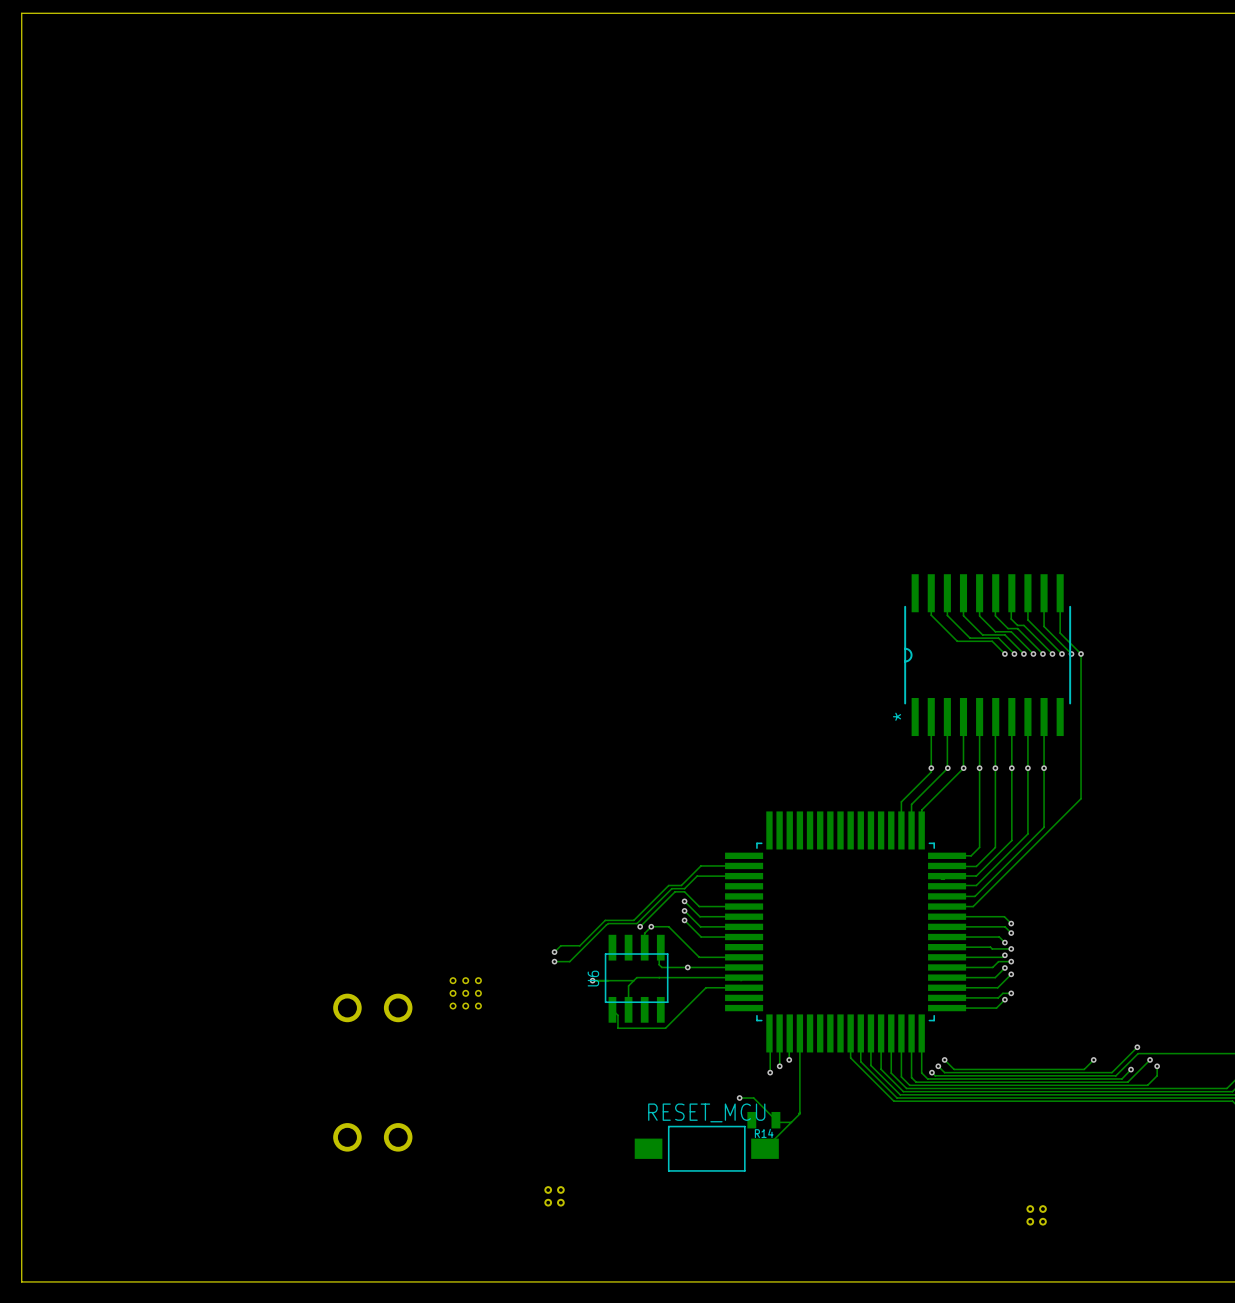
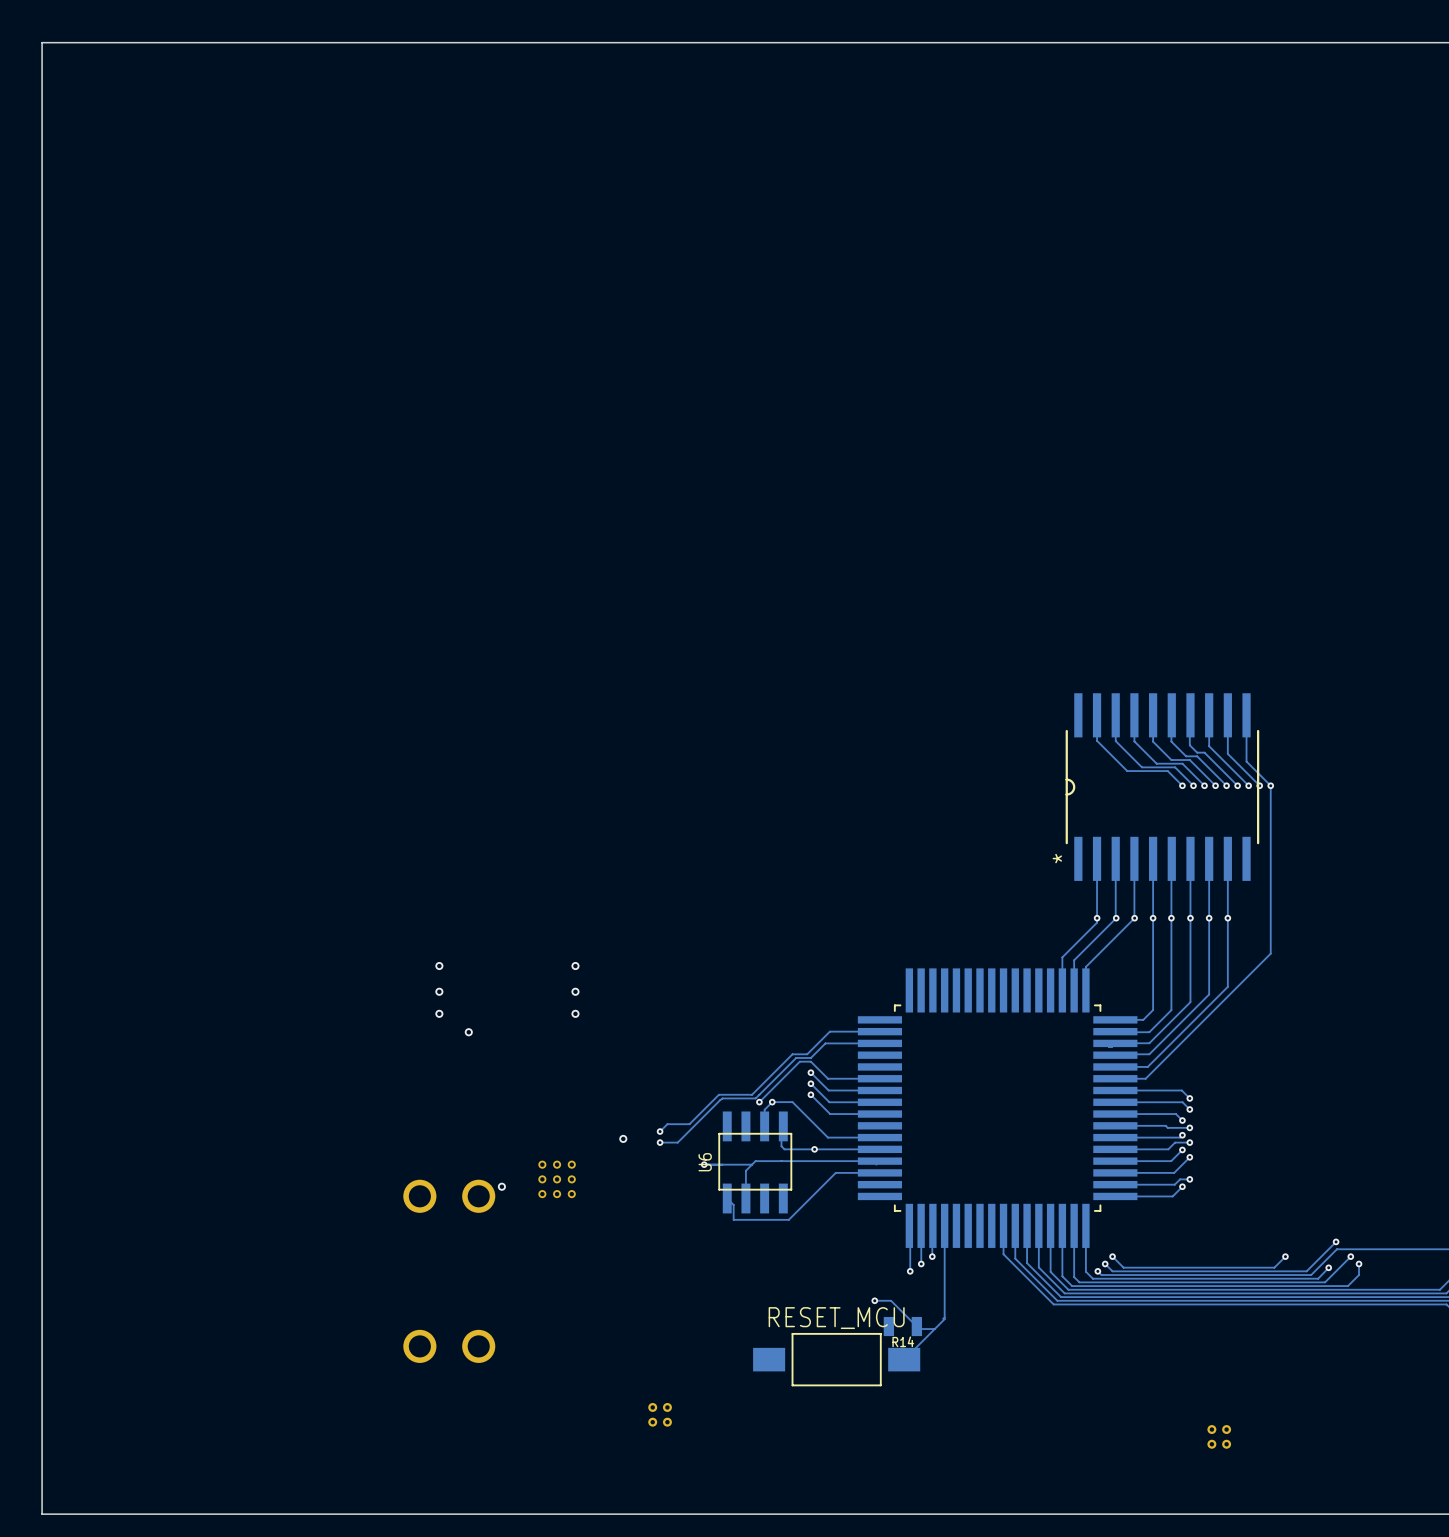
via: none -> (439, 966)
via: none -> (575, 966)
via: none -> (439, 991)
via: none -> (575, 991)
via: none -> (439, 1013)
via: none -> (575, 1013)
via: none -> (468, 1032)
via: none -> (623, 1138)
via: none -> (501, 1186)

